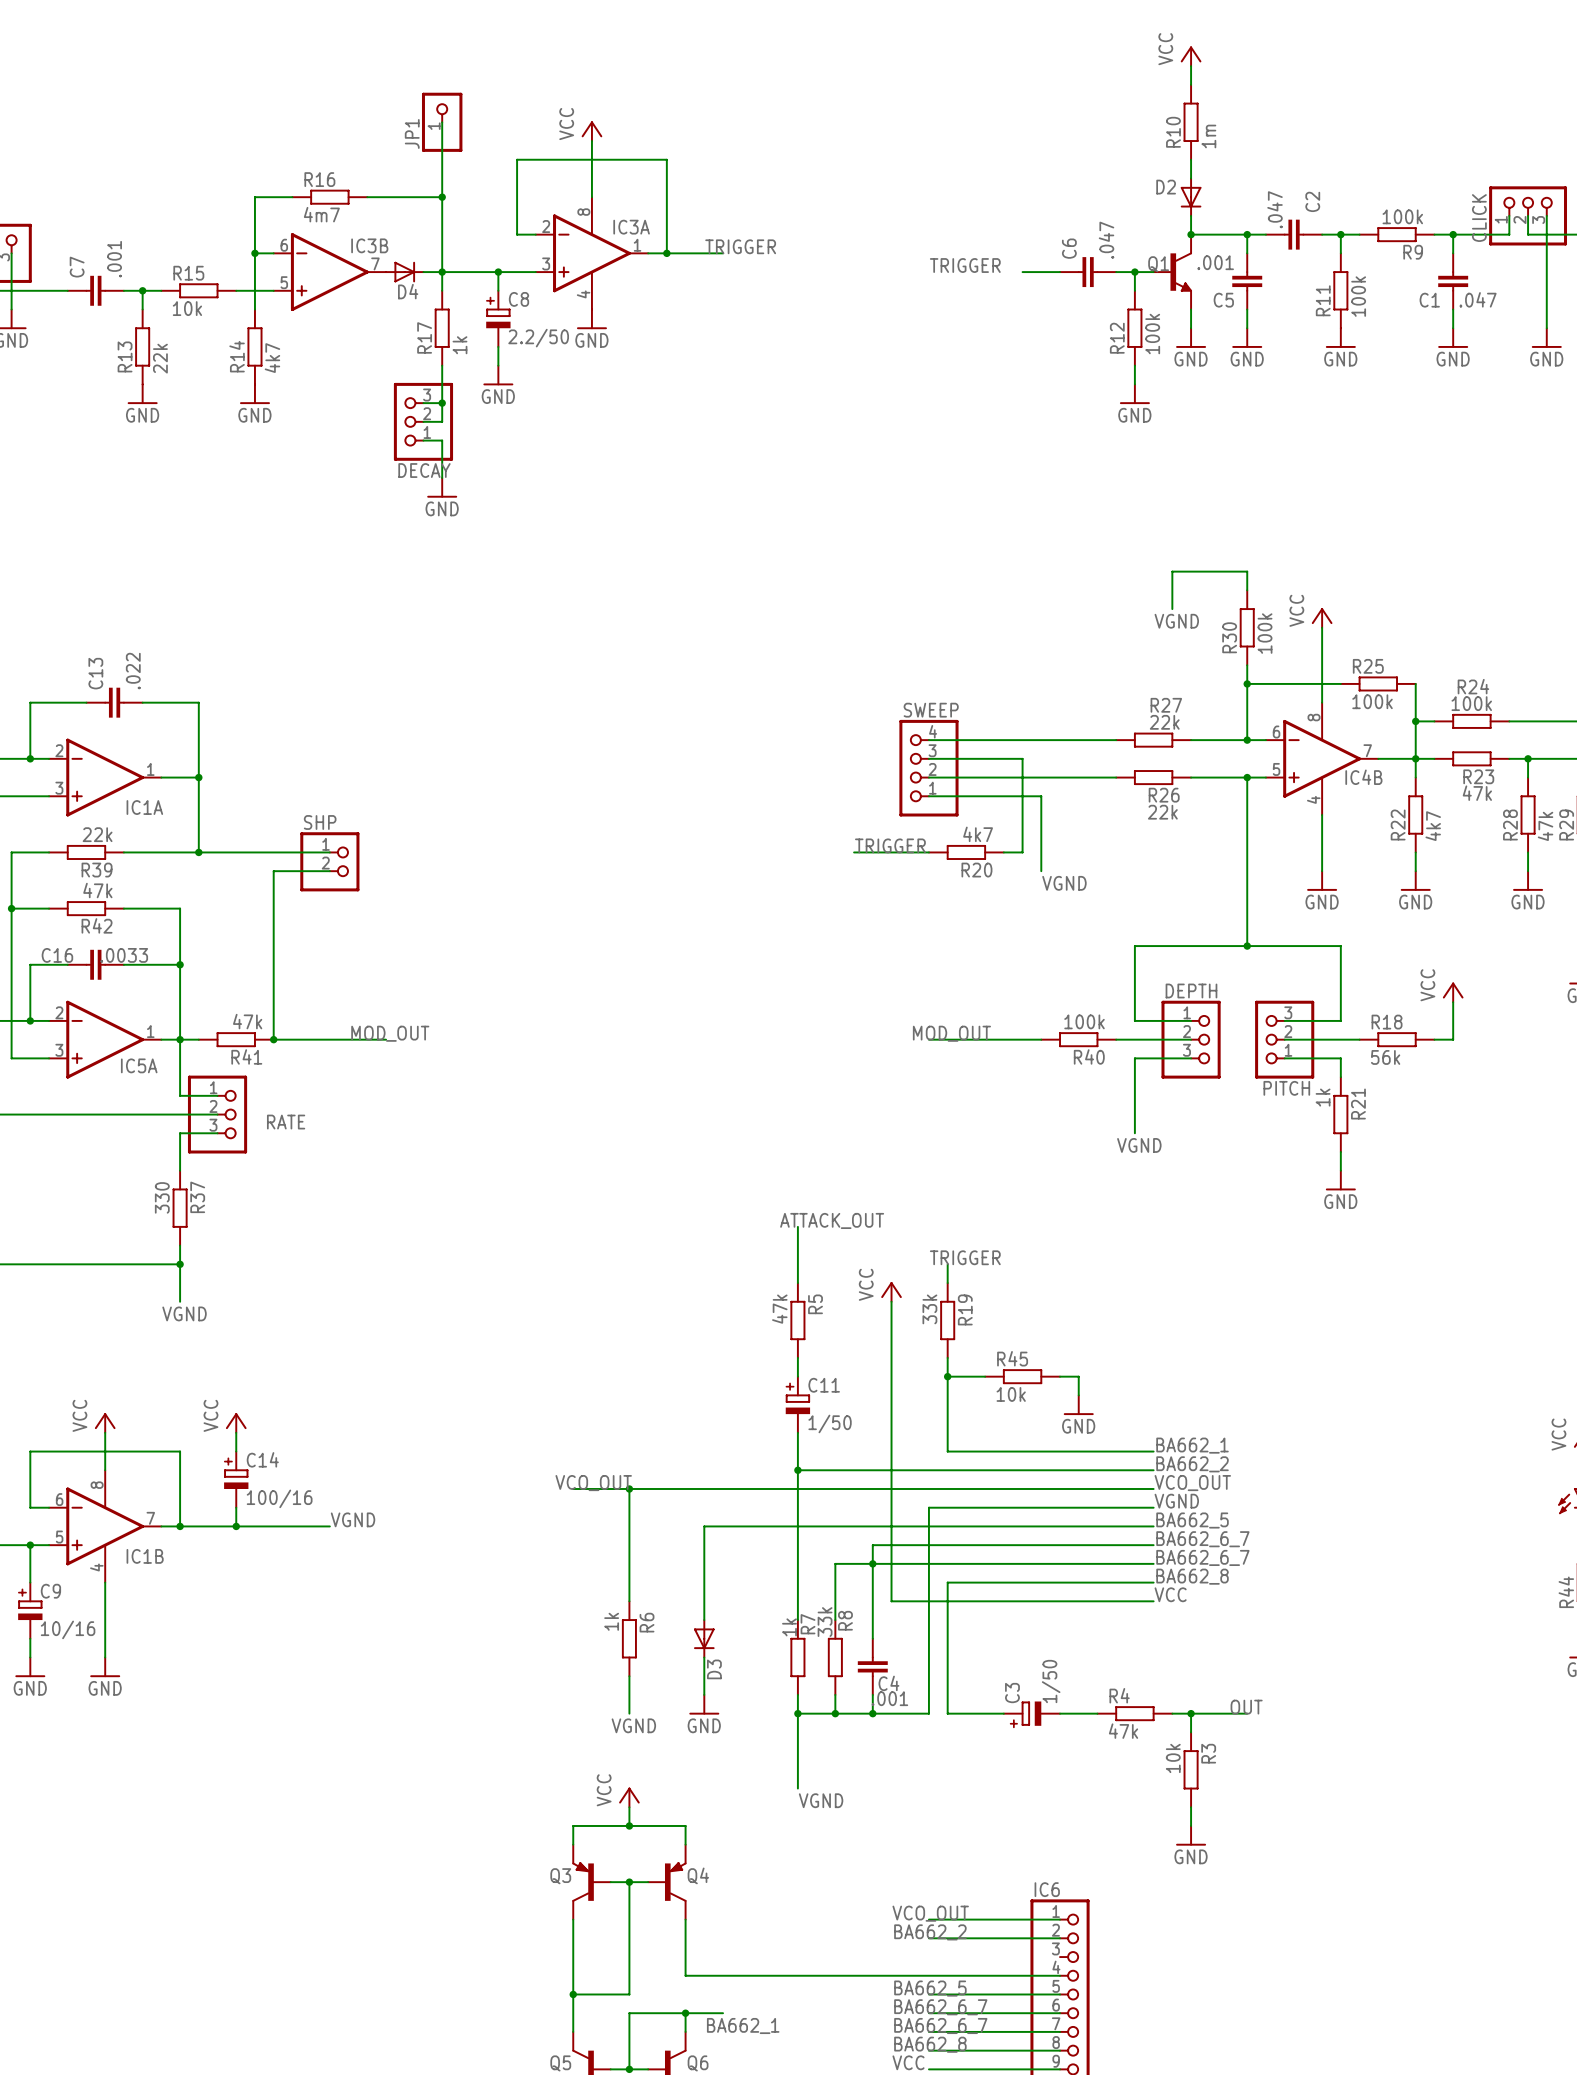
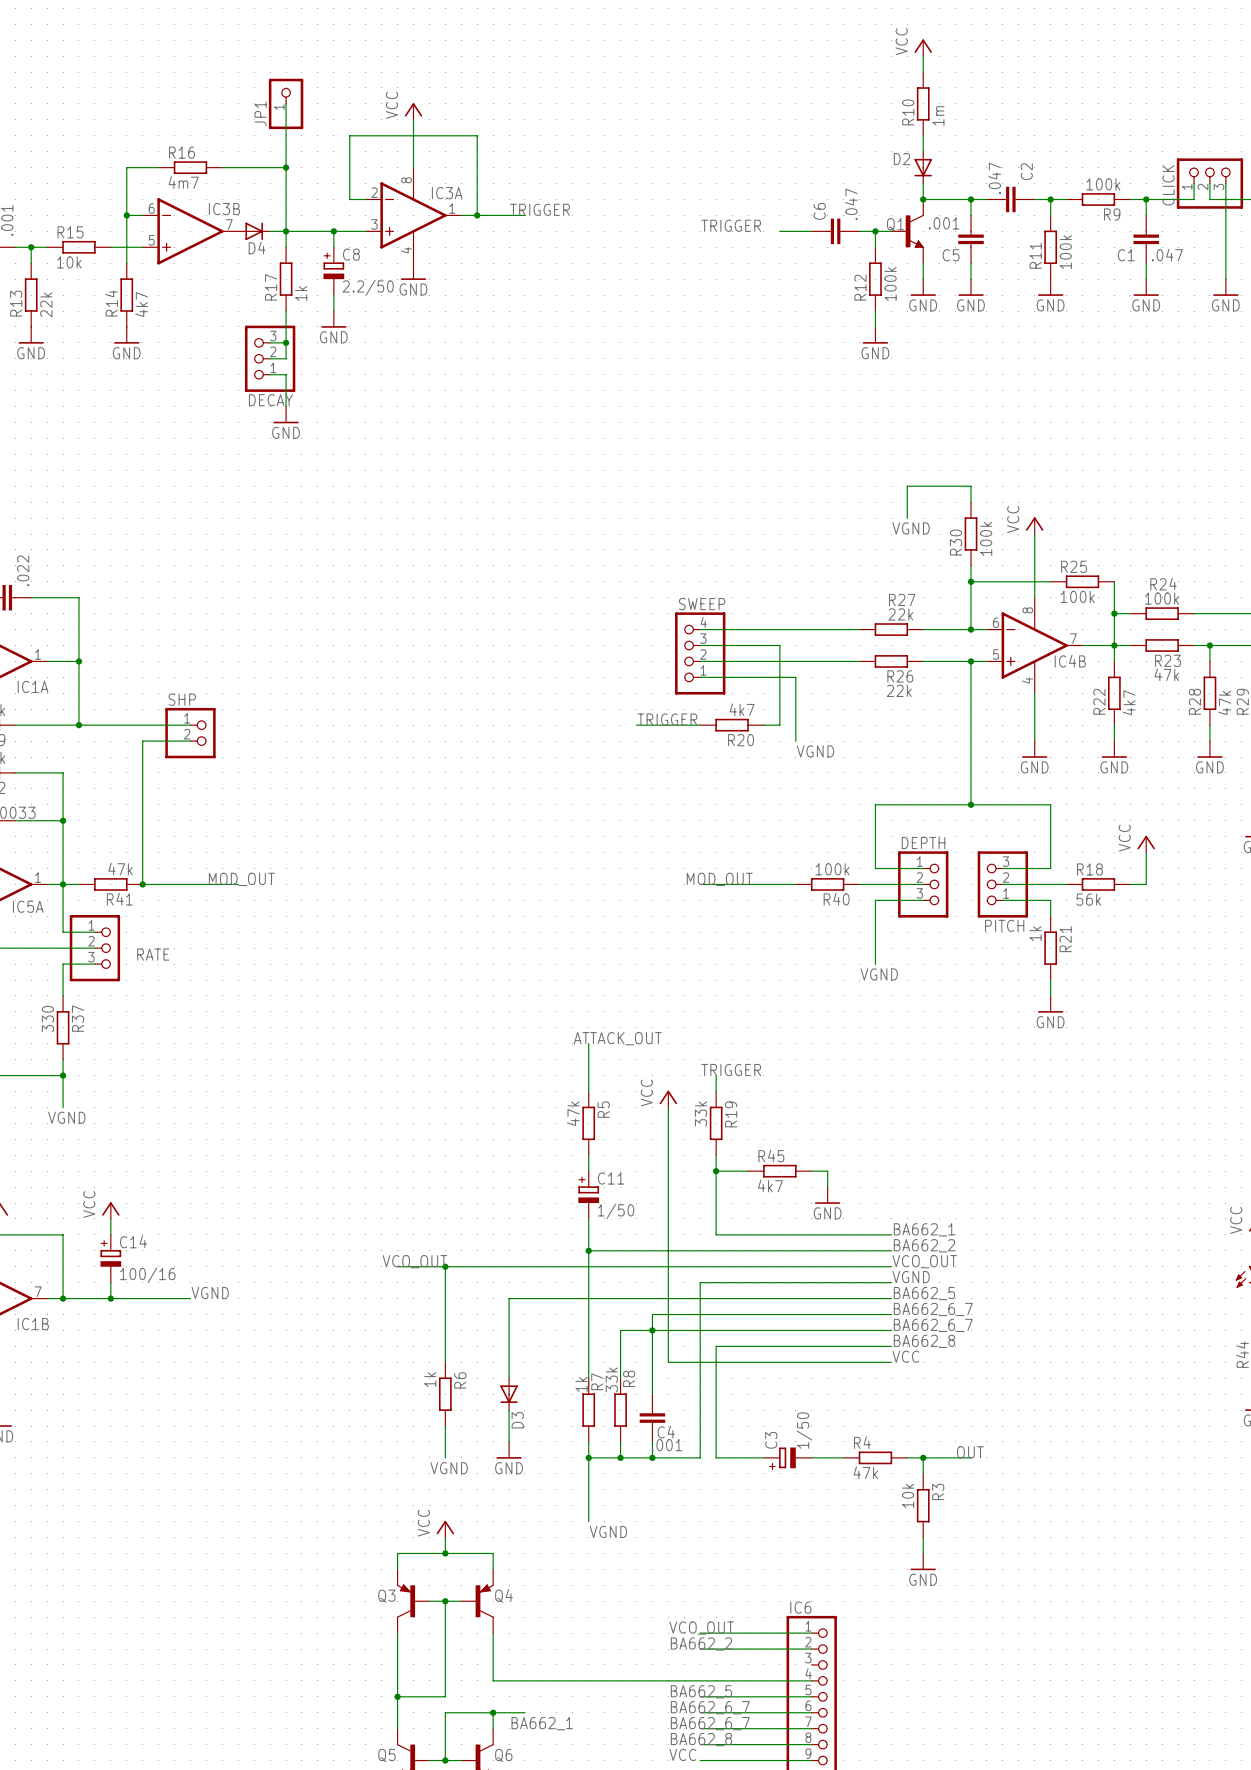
R45 value: 10k (1011, 1394) -> 4k7 (770, 1186)

